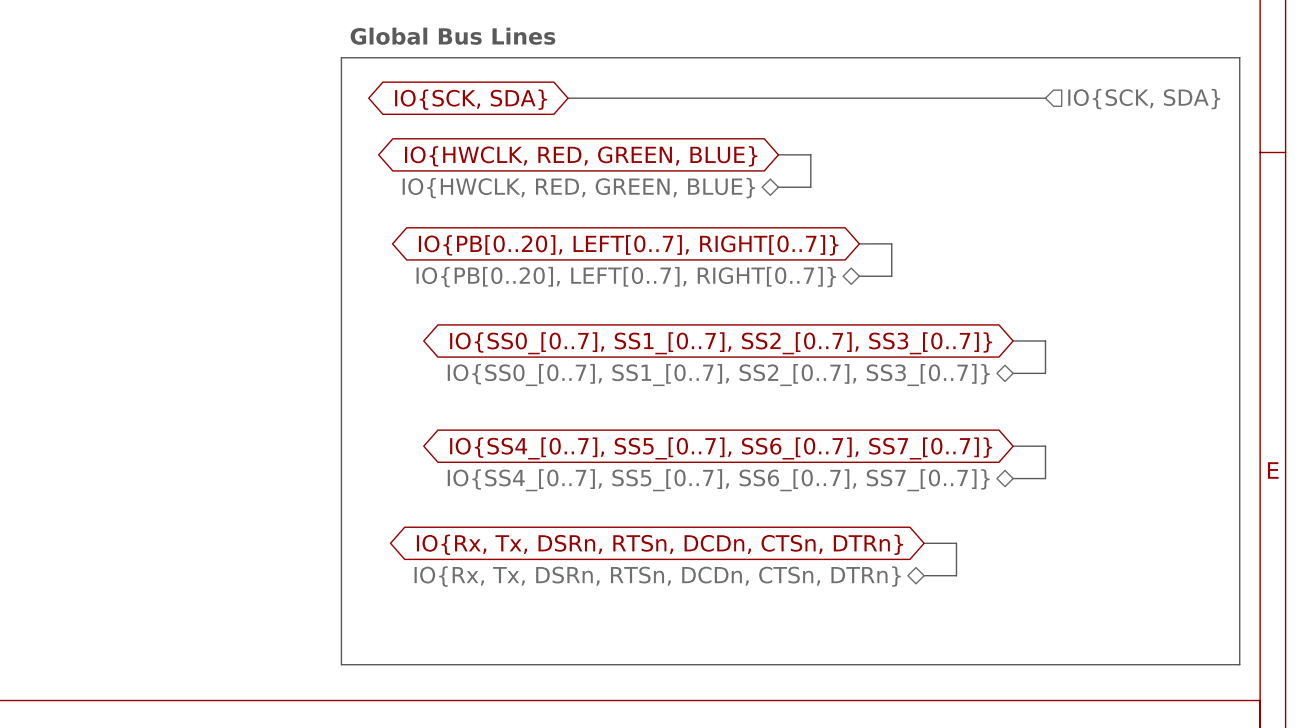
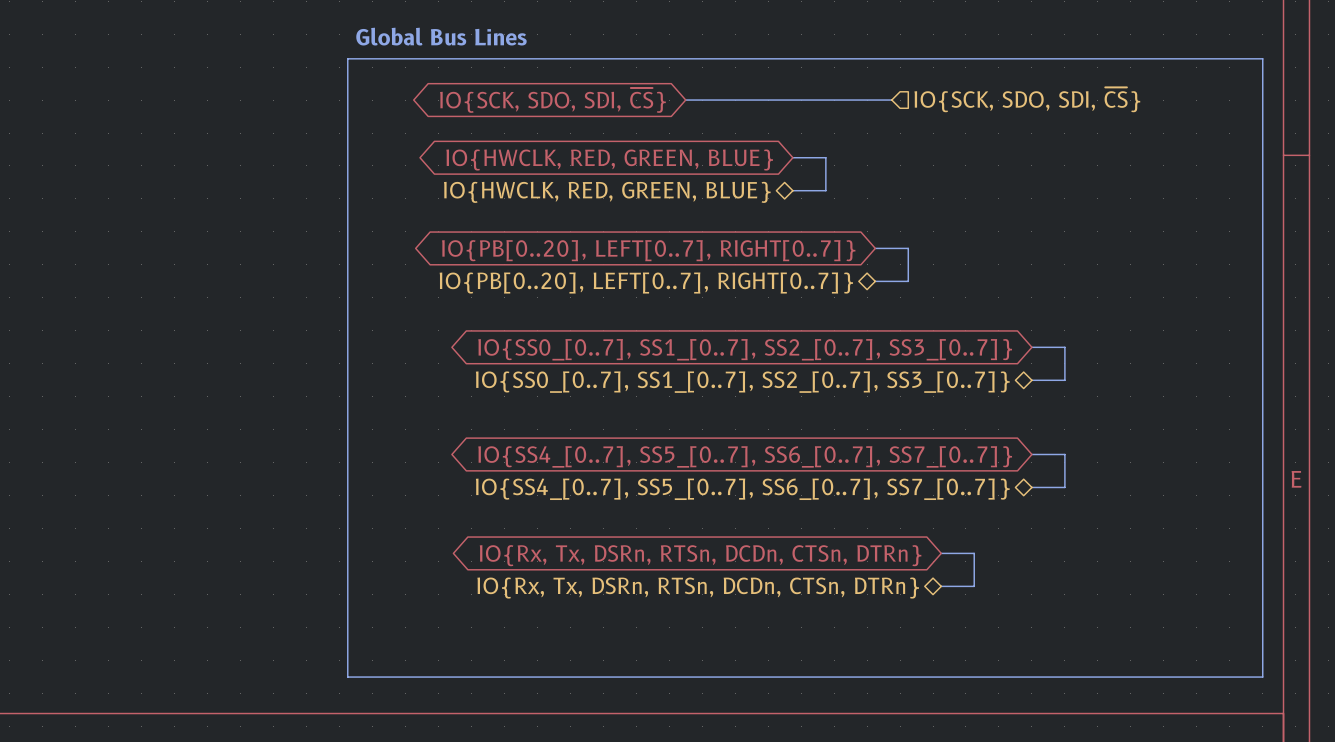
bus: (568, 98) (673, 98) -> none
bus: (875, 98) (1045, 98) -> none
global label: IO{SCK, SDA} (471, 99) -> IO{SCK, SDO, SDI, ~{CS}} (552, 100)
hierarchical label: IO{SCK, SDA} (1144, 99) -> IO{SCK, SDO, SDI, ~{CS}} (1027, 99)

